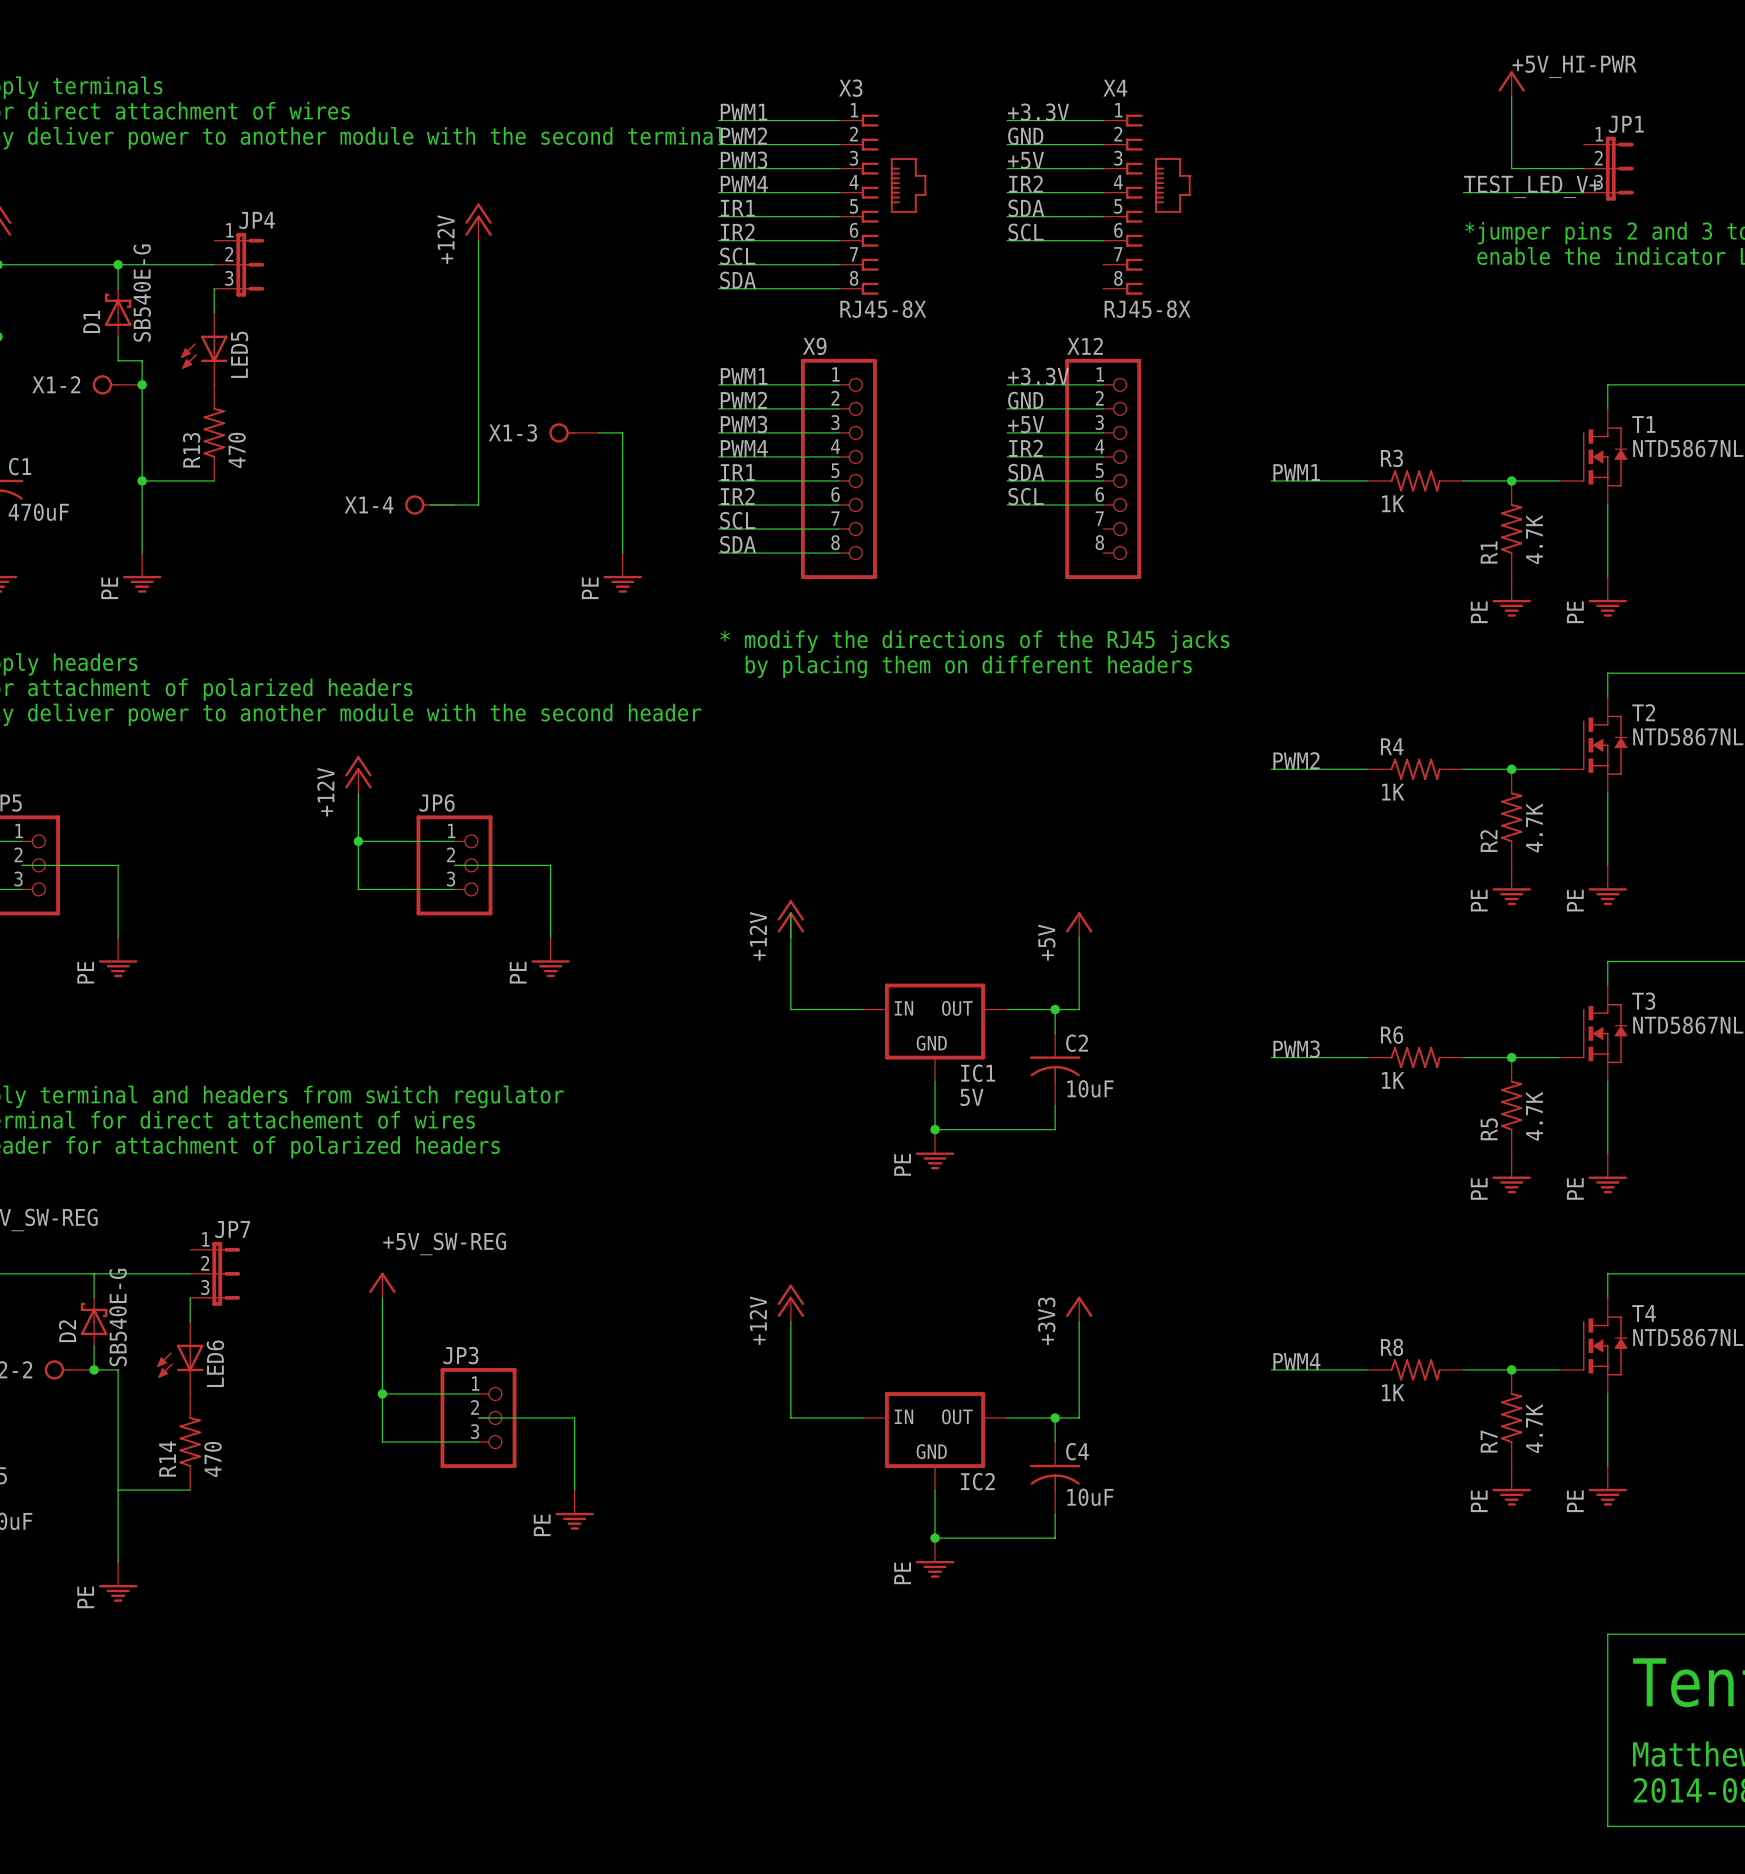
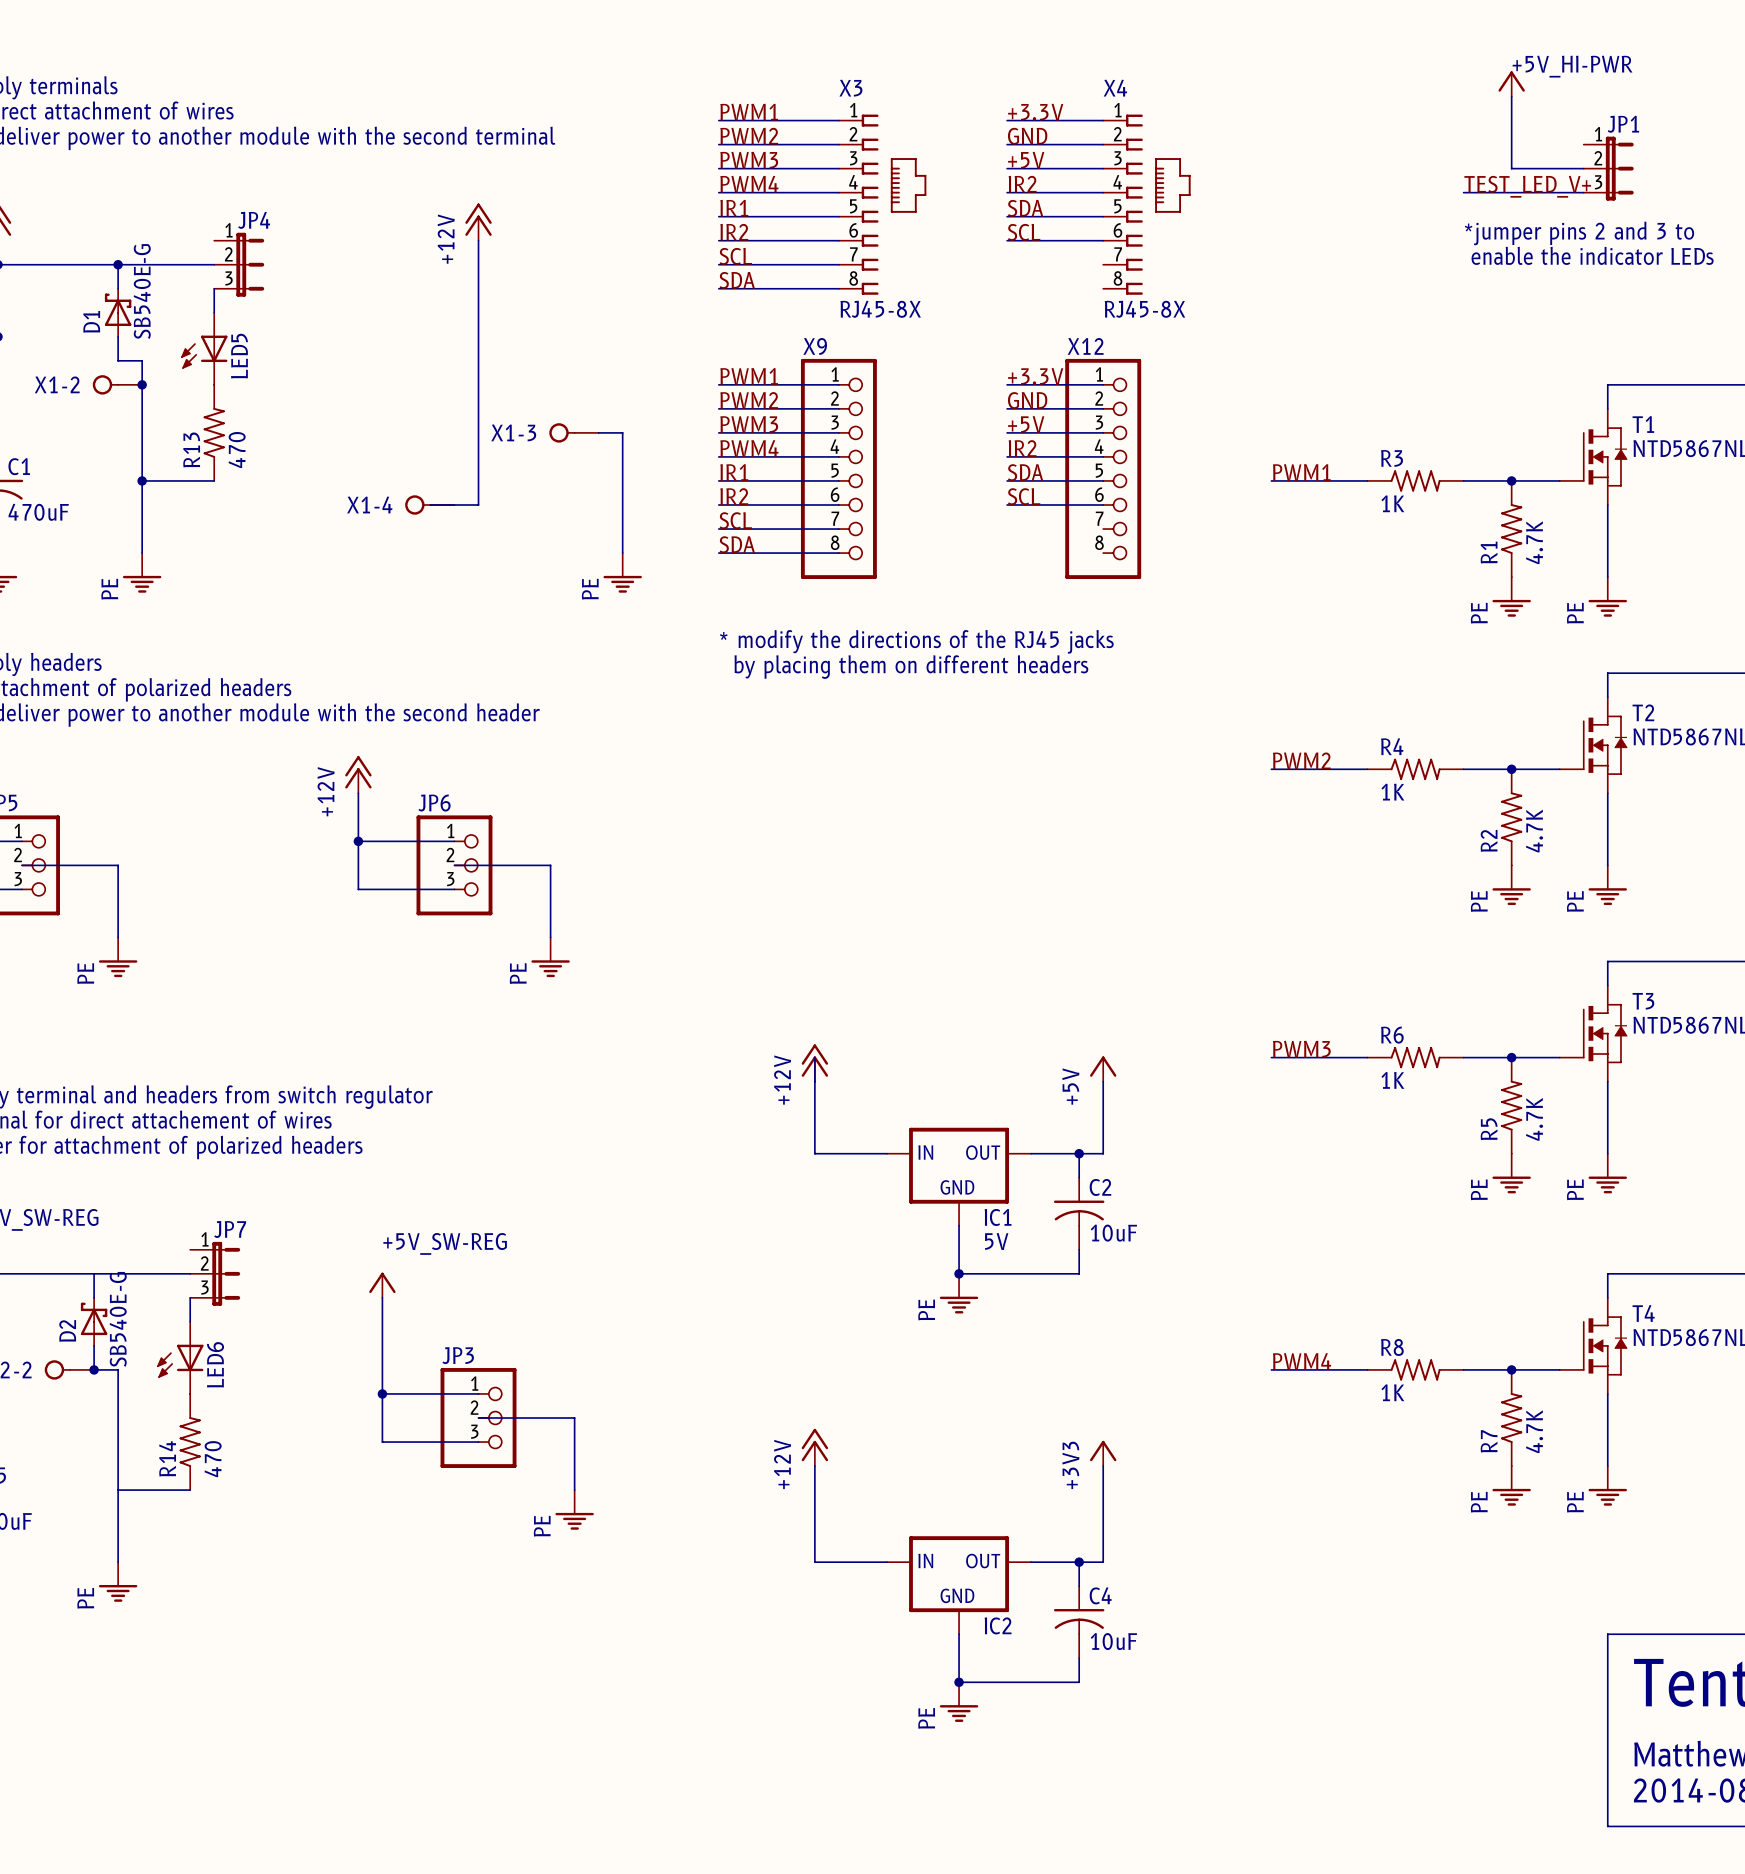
wire: (790, 913) (790, 1009) (862, 1009) -> (814, 1057) (814, 1153) (886, 1153)
power symbol: +12V (790, 918) -> none
power symbol position: +5V (1079, 924) -> +5V (1103, 1069)
wire: (1079, 937) (1079, 1009) (1007, 1009) -> (1103, 1081) (1103, 1153) (1031, 1153)
wire: (1055, 1009) (1055, 1033) -> (1079, 1153) (1079, 1177)
junction: (1055, 1009) -> none
IC1 position: (935, 1032) -> (959, 1176)
power symbol: none -> +12V (814, 1063)
C2 position: (1055, 1069) -> (1079, 1213)
wire: (935, 1081) (935, 1129) (1055, 1129) (1055, 1105) -> (959, 1225) (959, 1273) (1079, 1273) (1079, 1249)
junction: (935, 1129) -> none
power symbol: PE (935, 1149) -> none
junction: none -> (1079, 1153)
junction: none -> (959, 1273)
power symbol: none -> PE (959, 1293)
power symbol: +12V (790, 1303) -> none
power symbol position: +3V3 (1079, 1309) -> +3V3 (1103, 1453)
wire: (790, 1321) (790, 1418) (862, 1418) -> (814, 1466) (814, 1562) (886, 1562)
wire: (1079, 1321) (1079, 1418) (1007, 1418) -> (1103, 1466) (1103, 1562) (1031, 1562)
wire: (1055, 1418) (1055, 1442) -> (1079, 1562) (1079, 1586)
junction: (1055, 1418) -> none
IC2 position: (935, 1441) -> (959, 1585)
power symbol: none -> +12V (814, 1447)
C4 position: (1055, 1478) -> (1079, 1622)
wire: (935, 1490) (935, 1538) (1055, 1538) (1055, 1514) -> (959, 1634) (959, 1682) (1079, 1682) (1079, 1658)
junction: (935, 1538) -> none
power symbol: PE (935, 1557) -> none
junction: none -> (1079, 1562)
junction: none -> (959, 1682)
power symbol: none -> PE (959, 1702)

